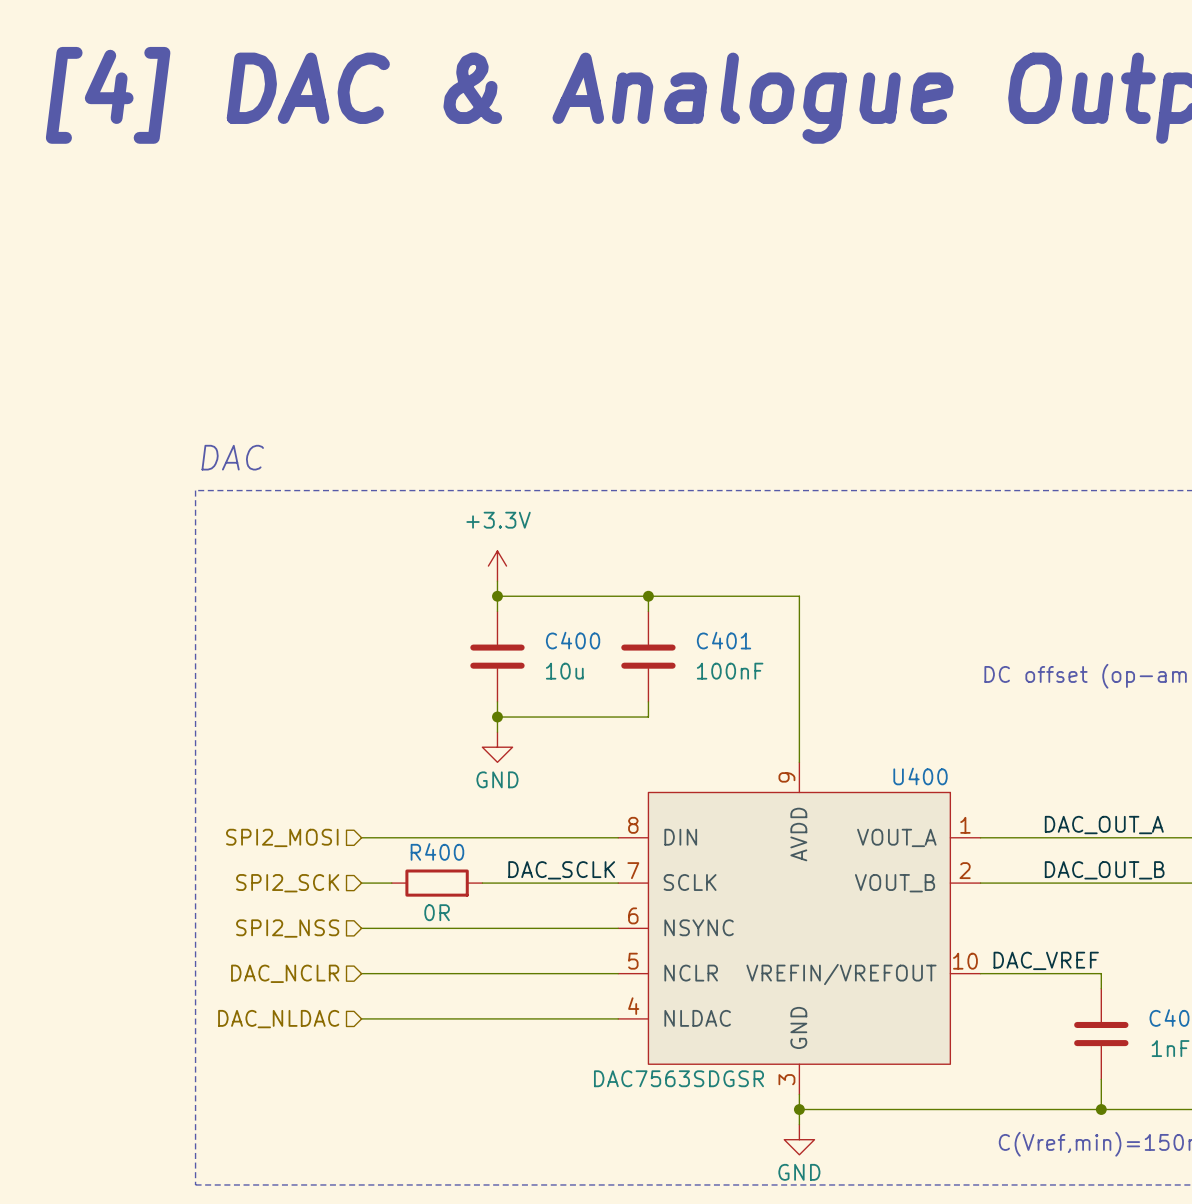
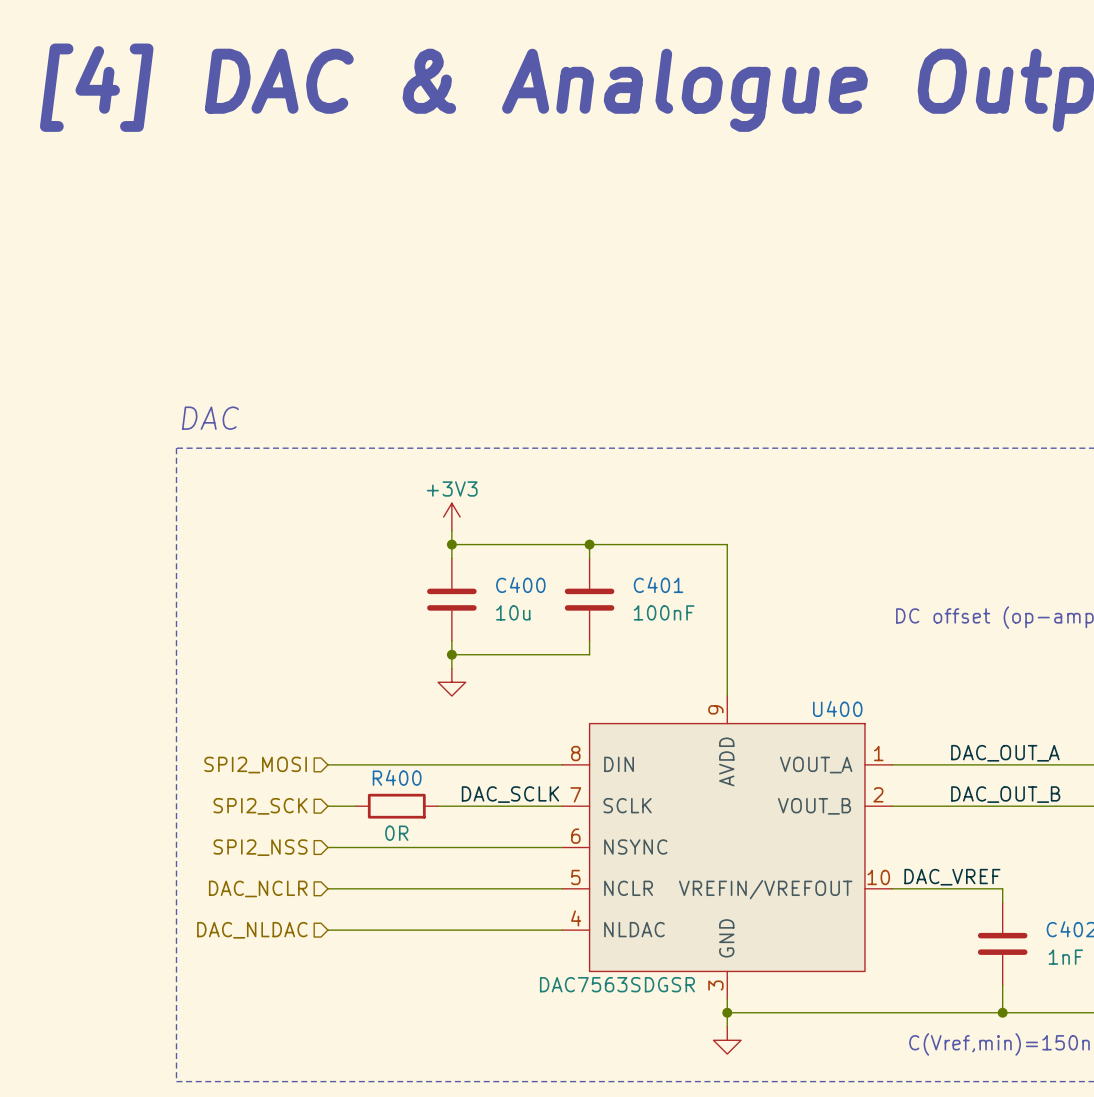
power symbol: +3.3V (497, 566) -> +3V3 (451, 517)
power symbol text: GND (497, 779) -> none
power symbol text: GND (799, 1172) -> none

